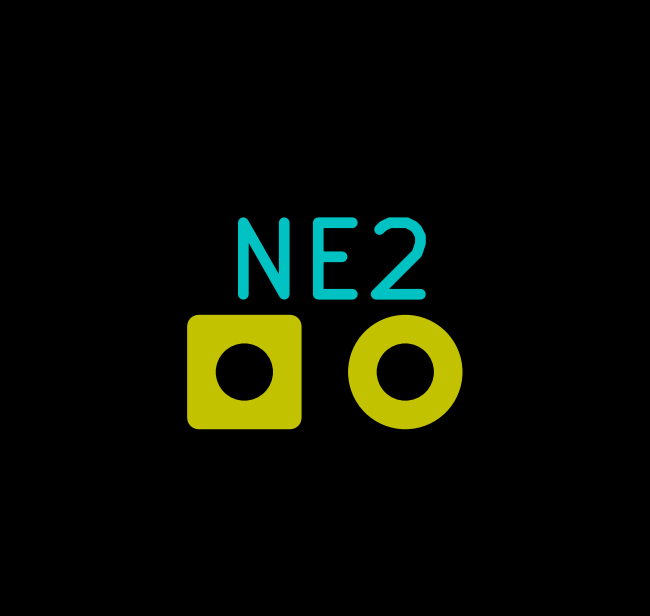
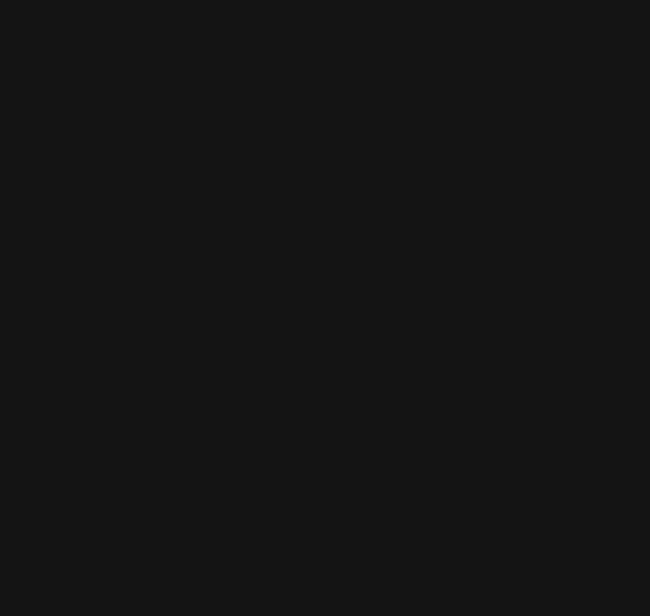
NE2: (324, 372) -> none

